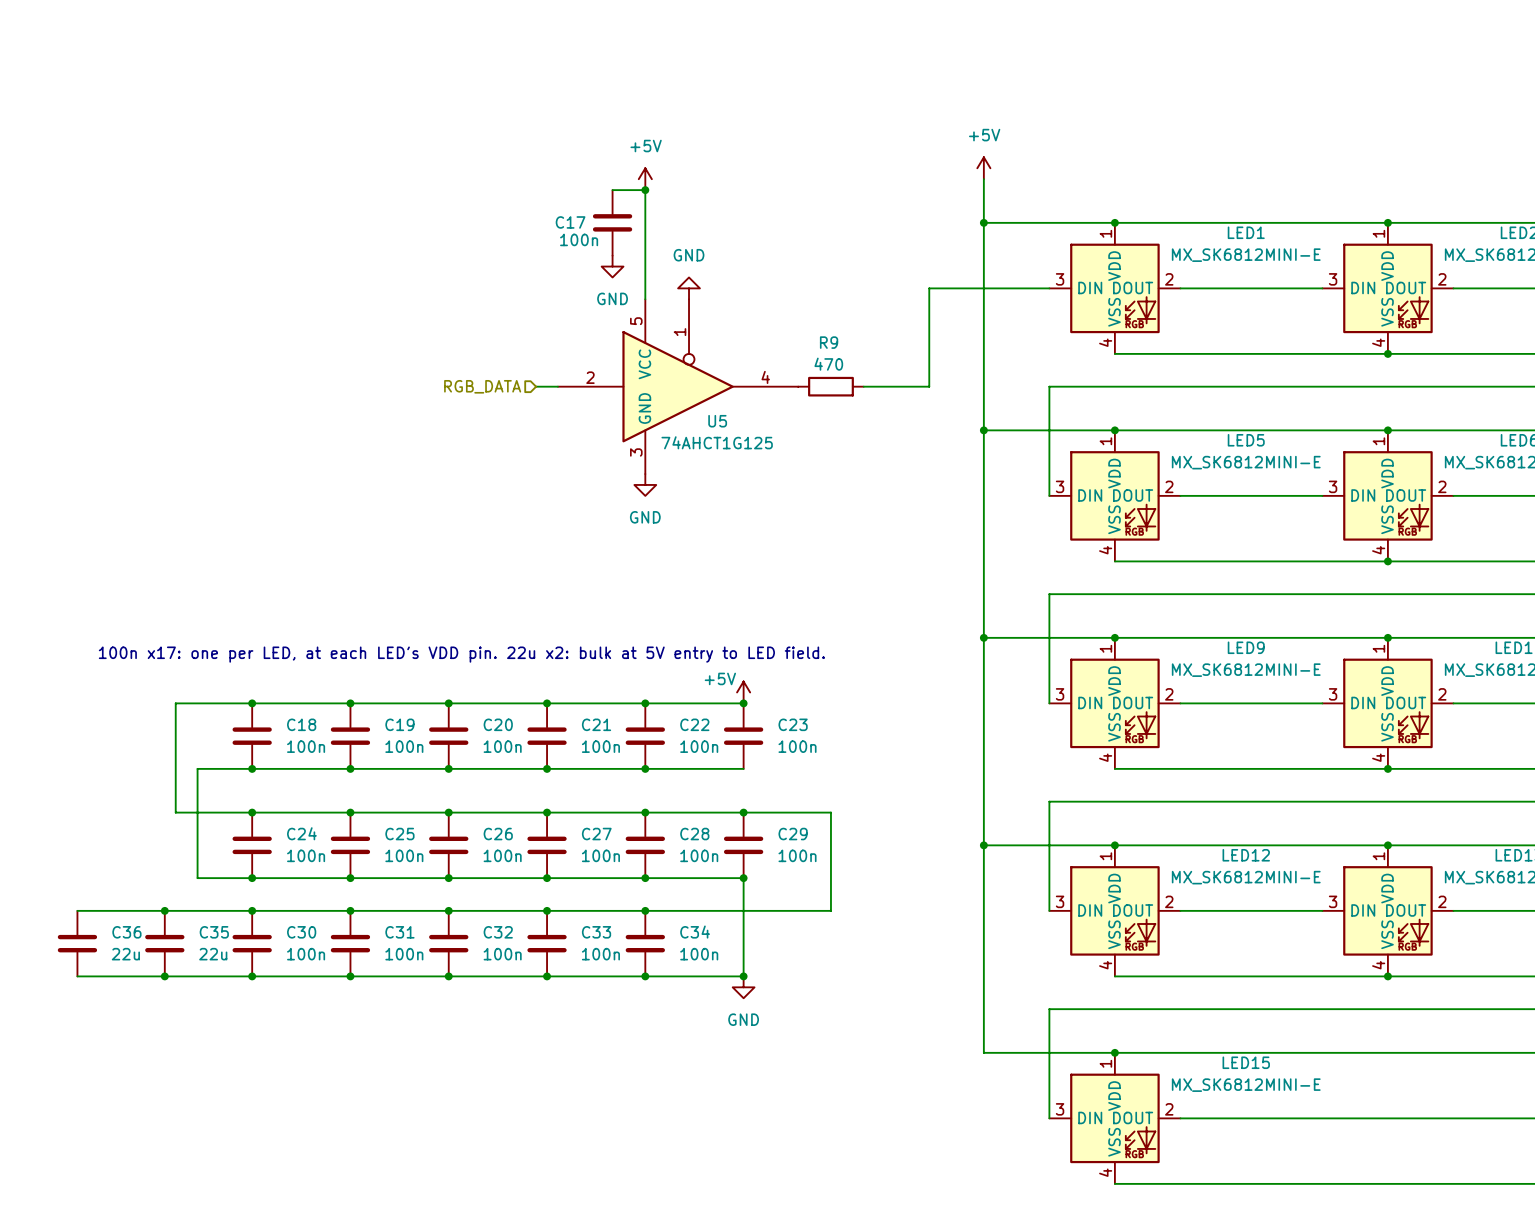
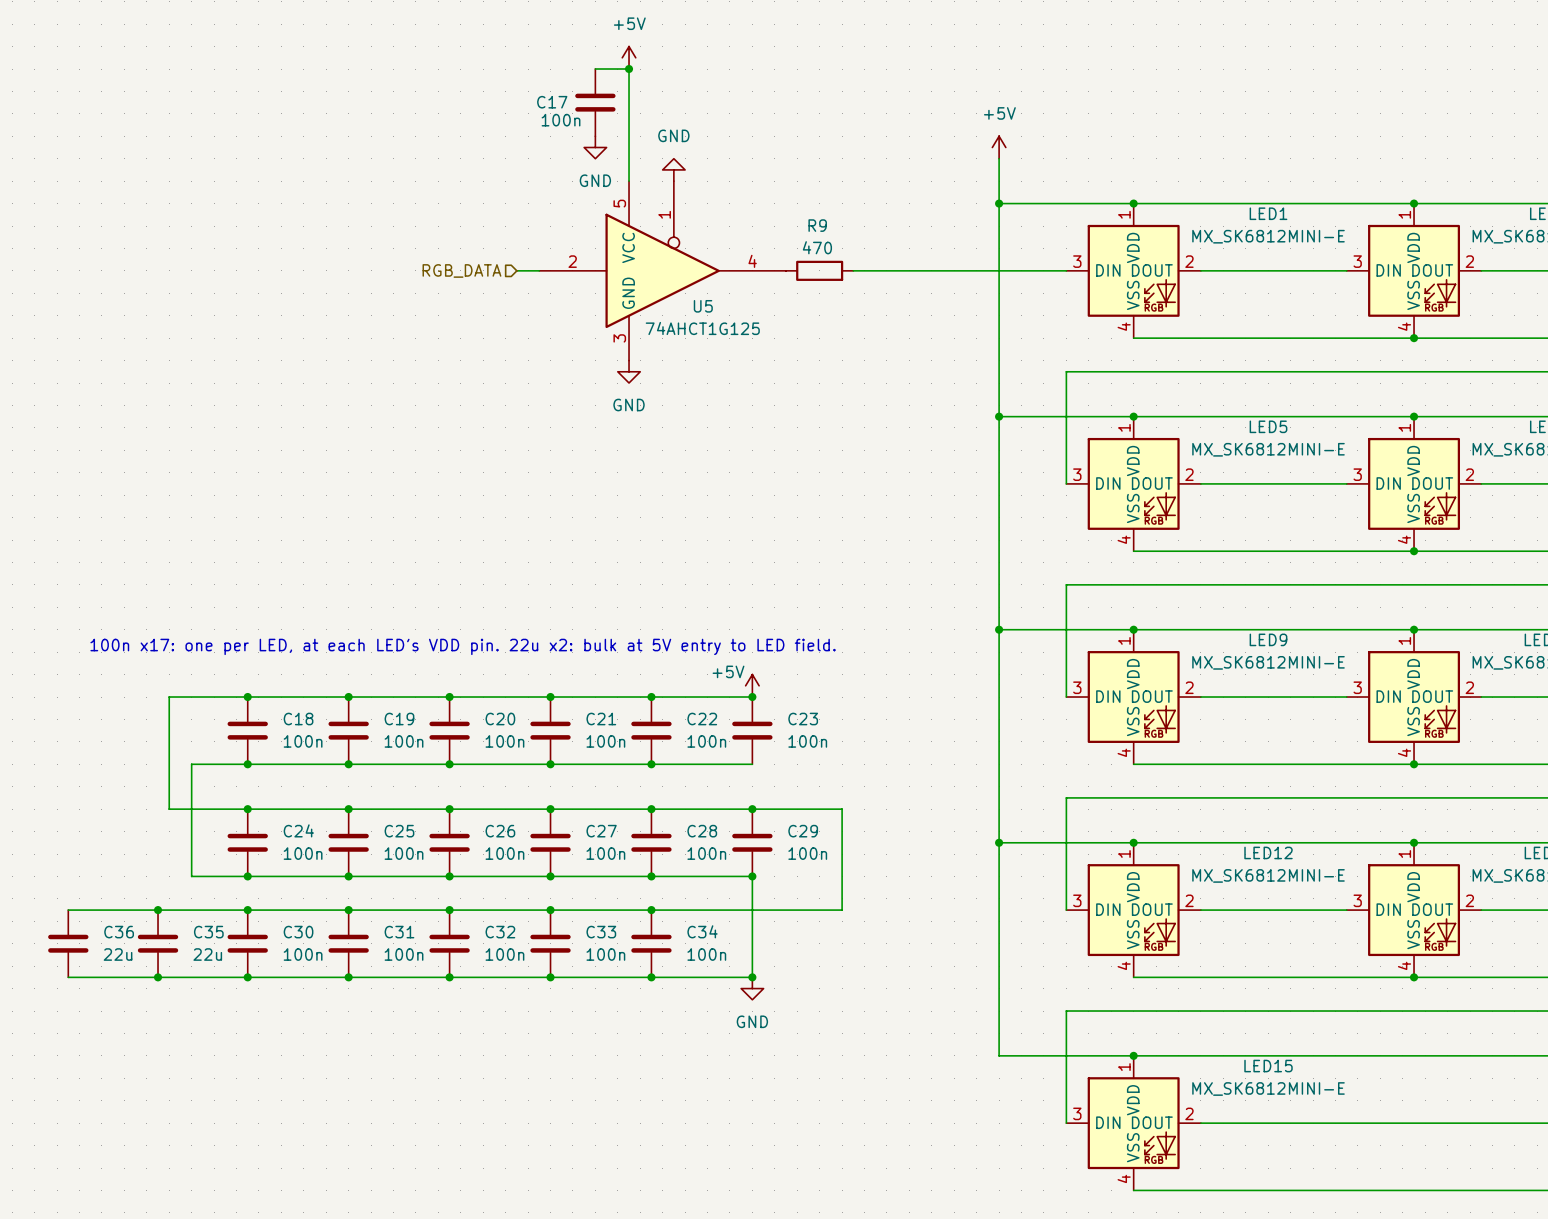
junction: none -> (629, 69)
power symbol: none -> GND (595, 147)
power symbol position: +5V (645, 179) -> +5V (629, 57)
wire: (612, 190) (645, 190) (645, 299) -> (595, 69) (629, 69) (629, 181)
junction: (645, 190) -> none
power symbol: none -> GND (673, 169)
C17 position: (612, 222) -> (595, 102)
power symbol: GND (612, 266) -> none
power symbol: GND (689, 288) -> none
wire: (929, 288) (929, 386) (863, 386) -> (943, 270) (853, 270)
hierarchical label position: RGB_DATA (482, 386) -> RGB_DATA (461, 270)
wire: (536, 386) (557, 386) -> (516, 270) (539, 270)
power symbol: none -> GND (629, 371)
U5 position: (678, 386) -> (662, 270)
R9 position: (830, 386) -> (819, 270)
power symbol: GND (645, 484) -> none

